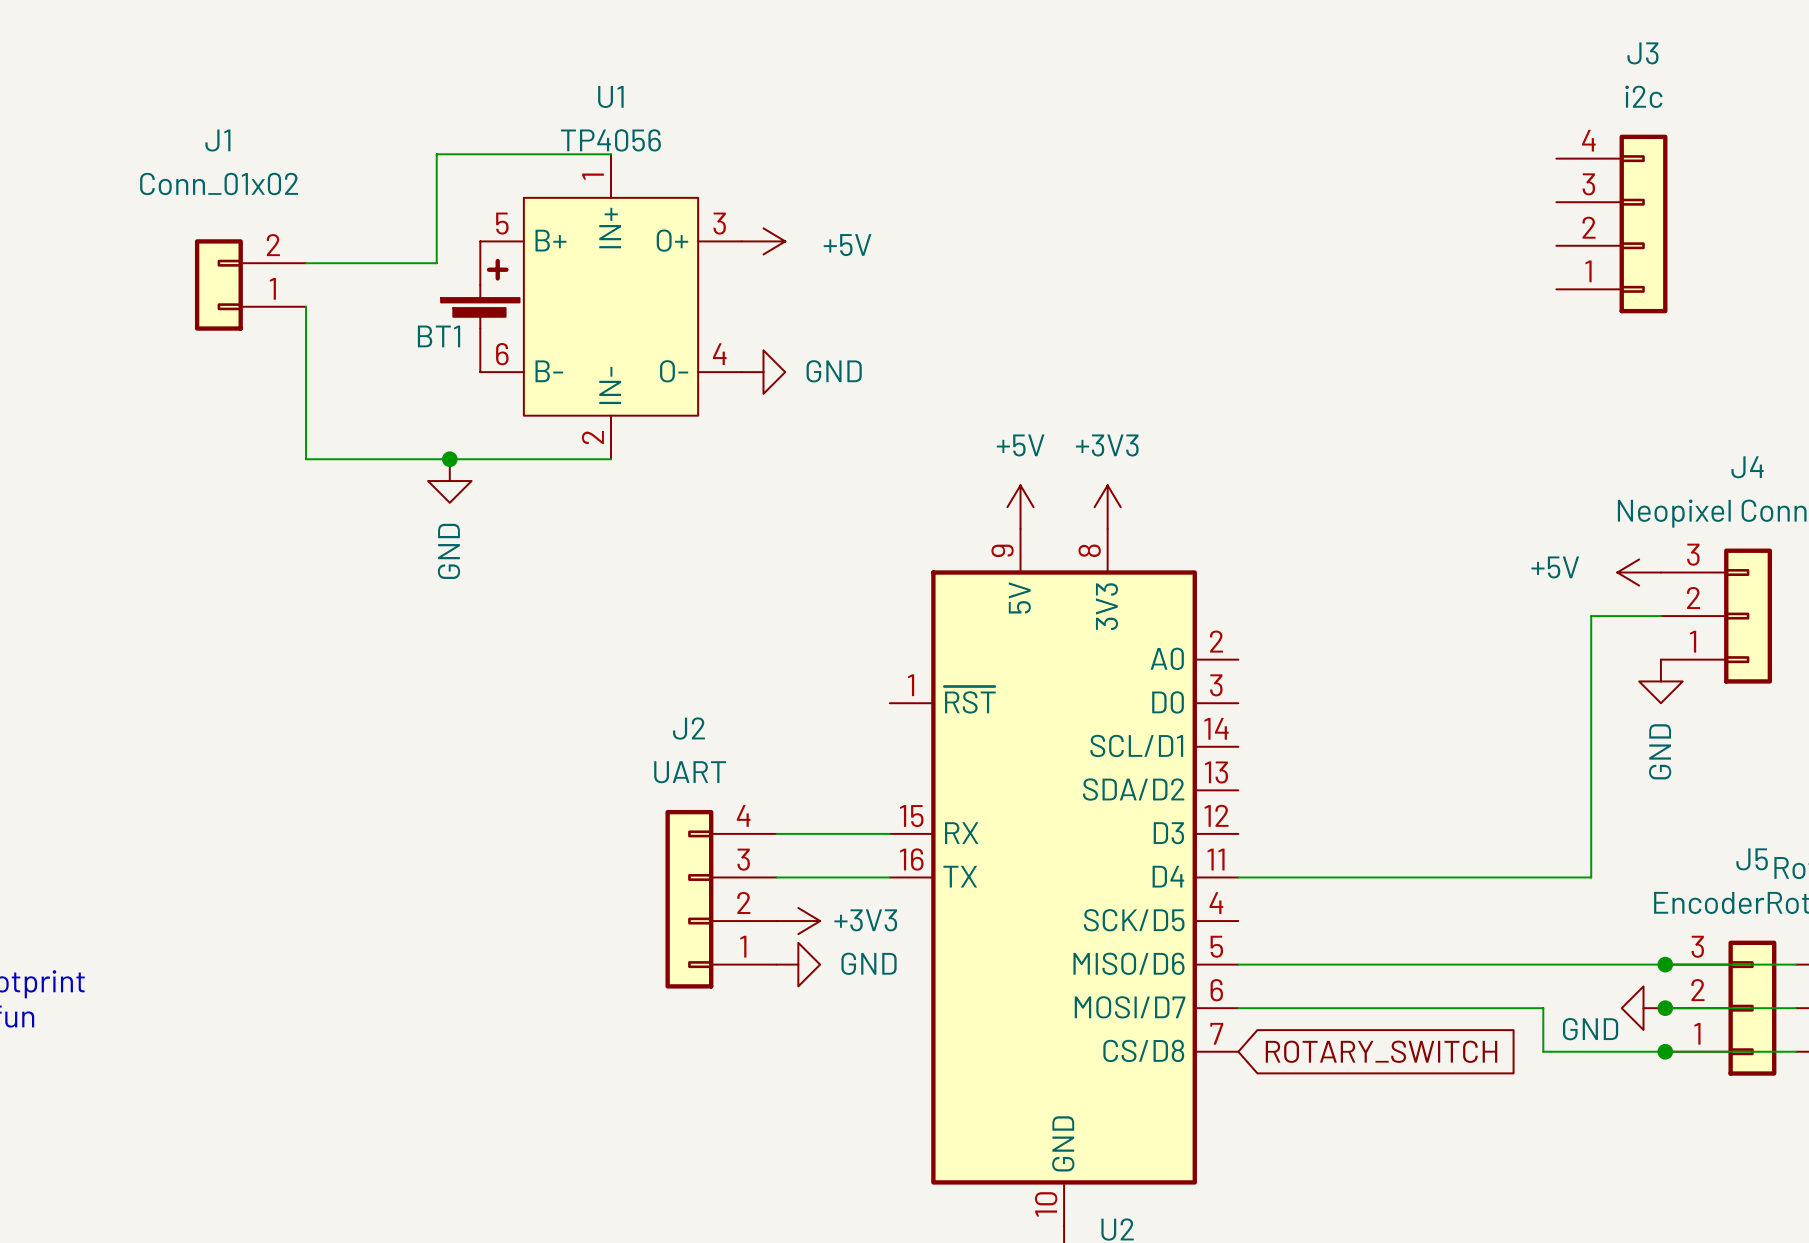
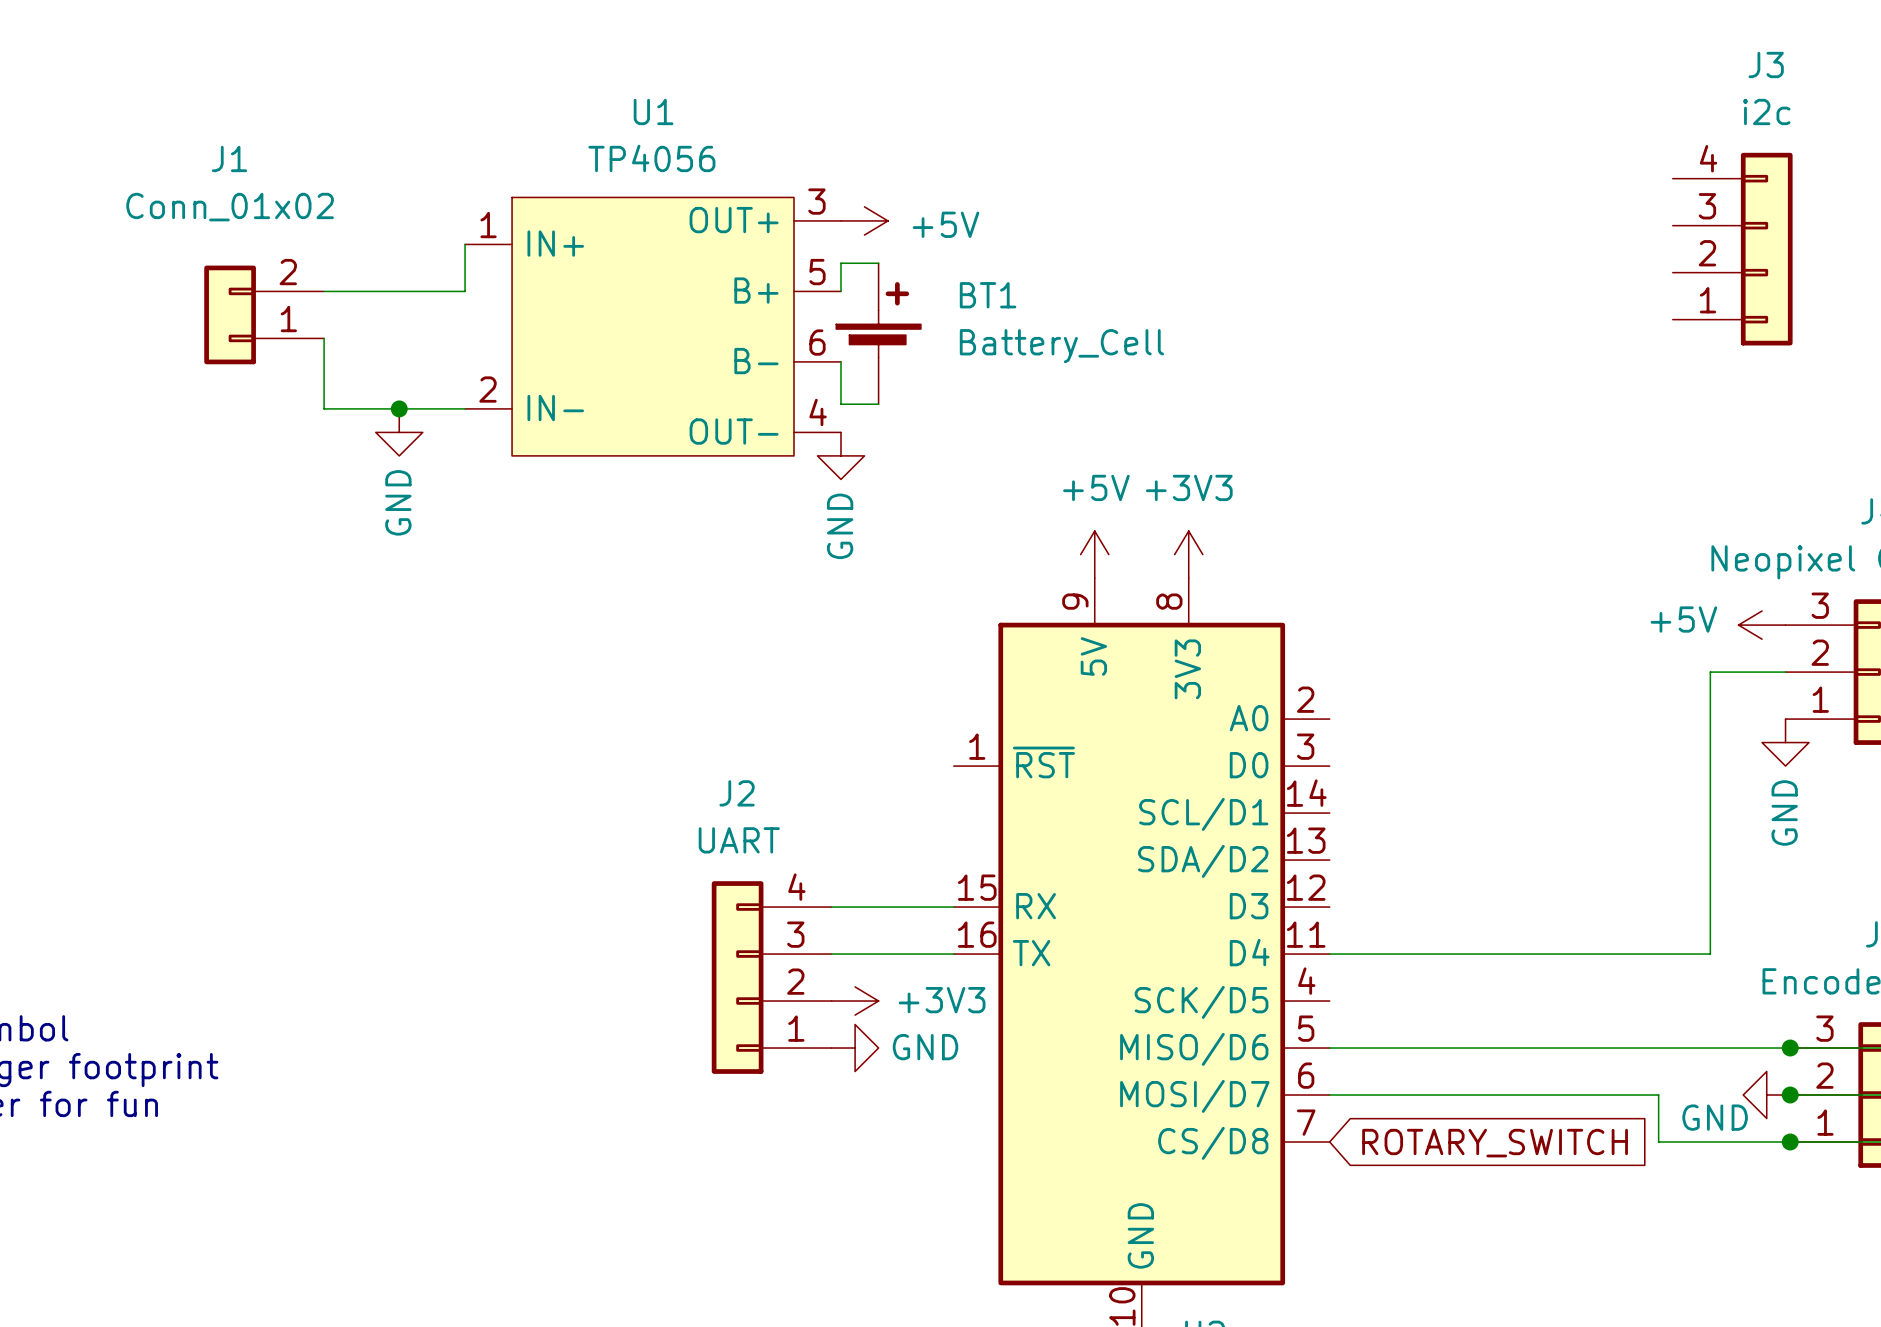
U1 symbol: [480, 154, 742, 460] -> [465, 197, 841, 456]
wire: (611, 154) (436, 154) (436, 219) -> none
wire: none -> (878, 263) (840, 263) (840, 291)
power symbol position: +5V (763, 241) -> +5V (864, 220)
BT1 position: (480, 306) -> (878, 333)
BT1 value: none -> Battery_Cell (1061, 346)
wire: none -> (840, 361) (840, 404) (878, 404)
BT1 name position: BT1 (439, 336) -> BT1 (988, 295)
wire: (306, 372) (306, 459) (611, 459) -> (324, 408) (465, 408)
junction: none -> (399, 408)
power symbol rotation: 0° (763, 372) -> 90° clockwise (840, 455)
power symbol position: GND (763, 372) -> GND (840, 455)
junction: (449, 459) -> none
power symbol position: GND (449, 481) -> GND (399, 432)

